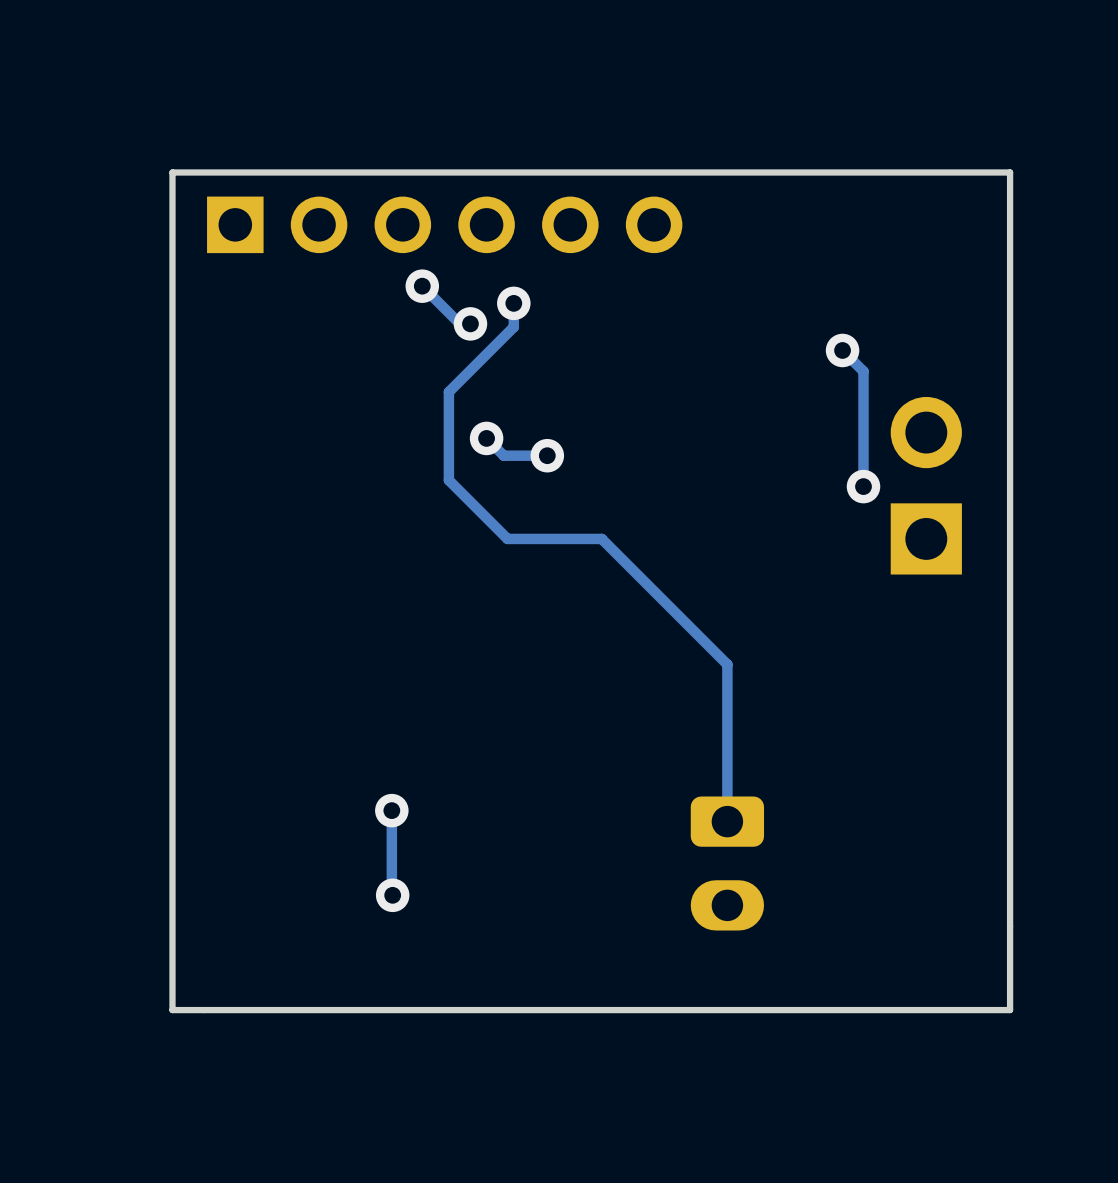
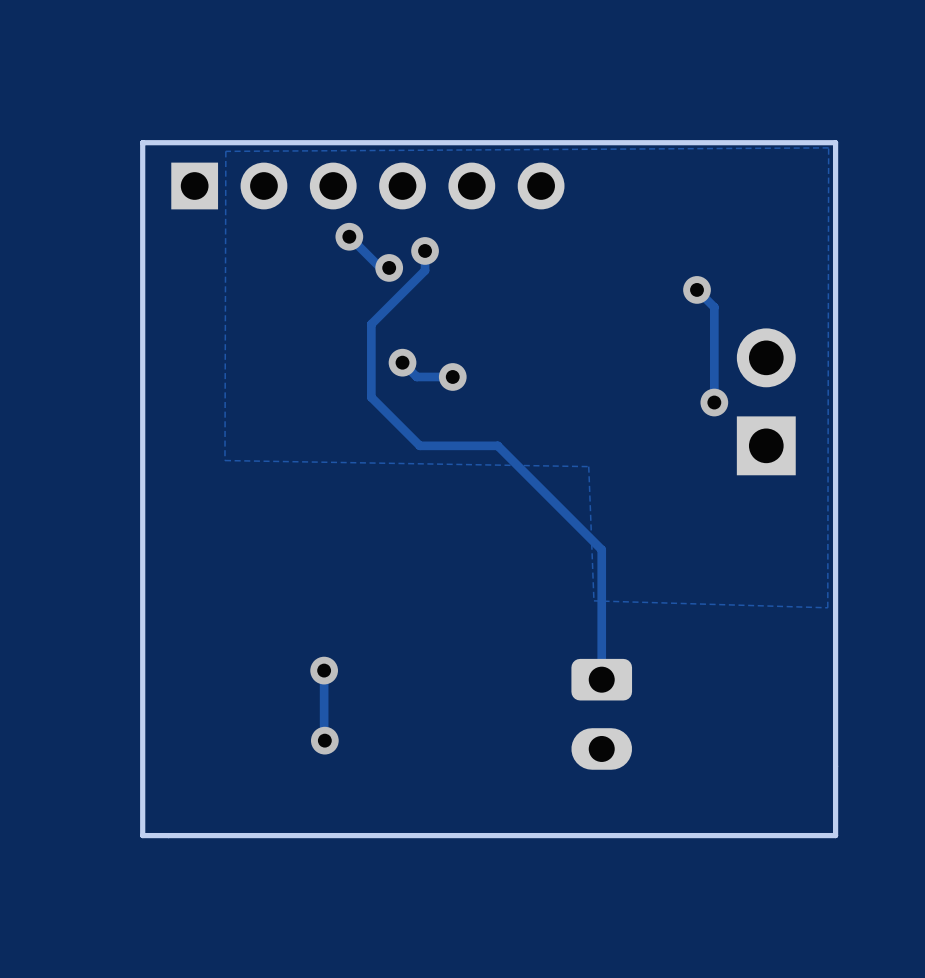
zone outline: none -> (828, 147) (225, 151) (224, 460) (588, 466) (593, 600) (827, 607) (828, 147)

